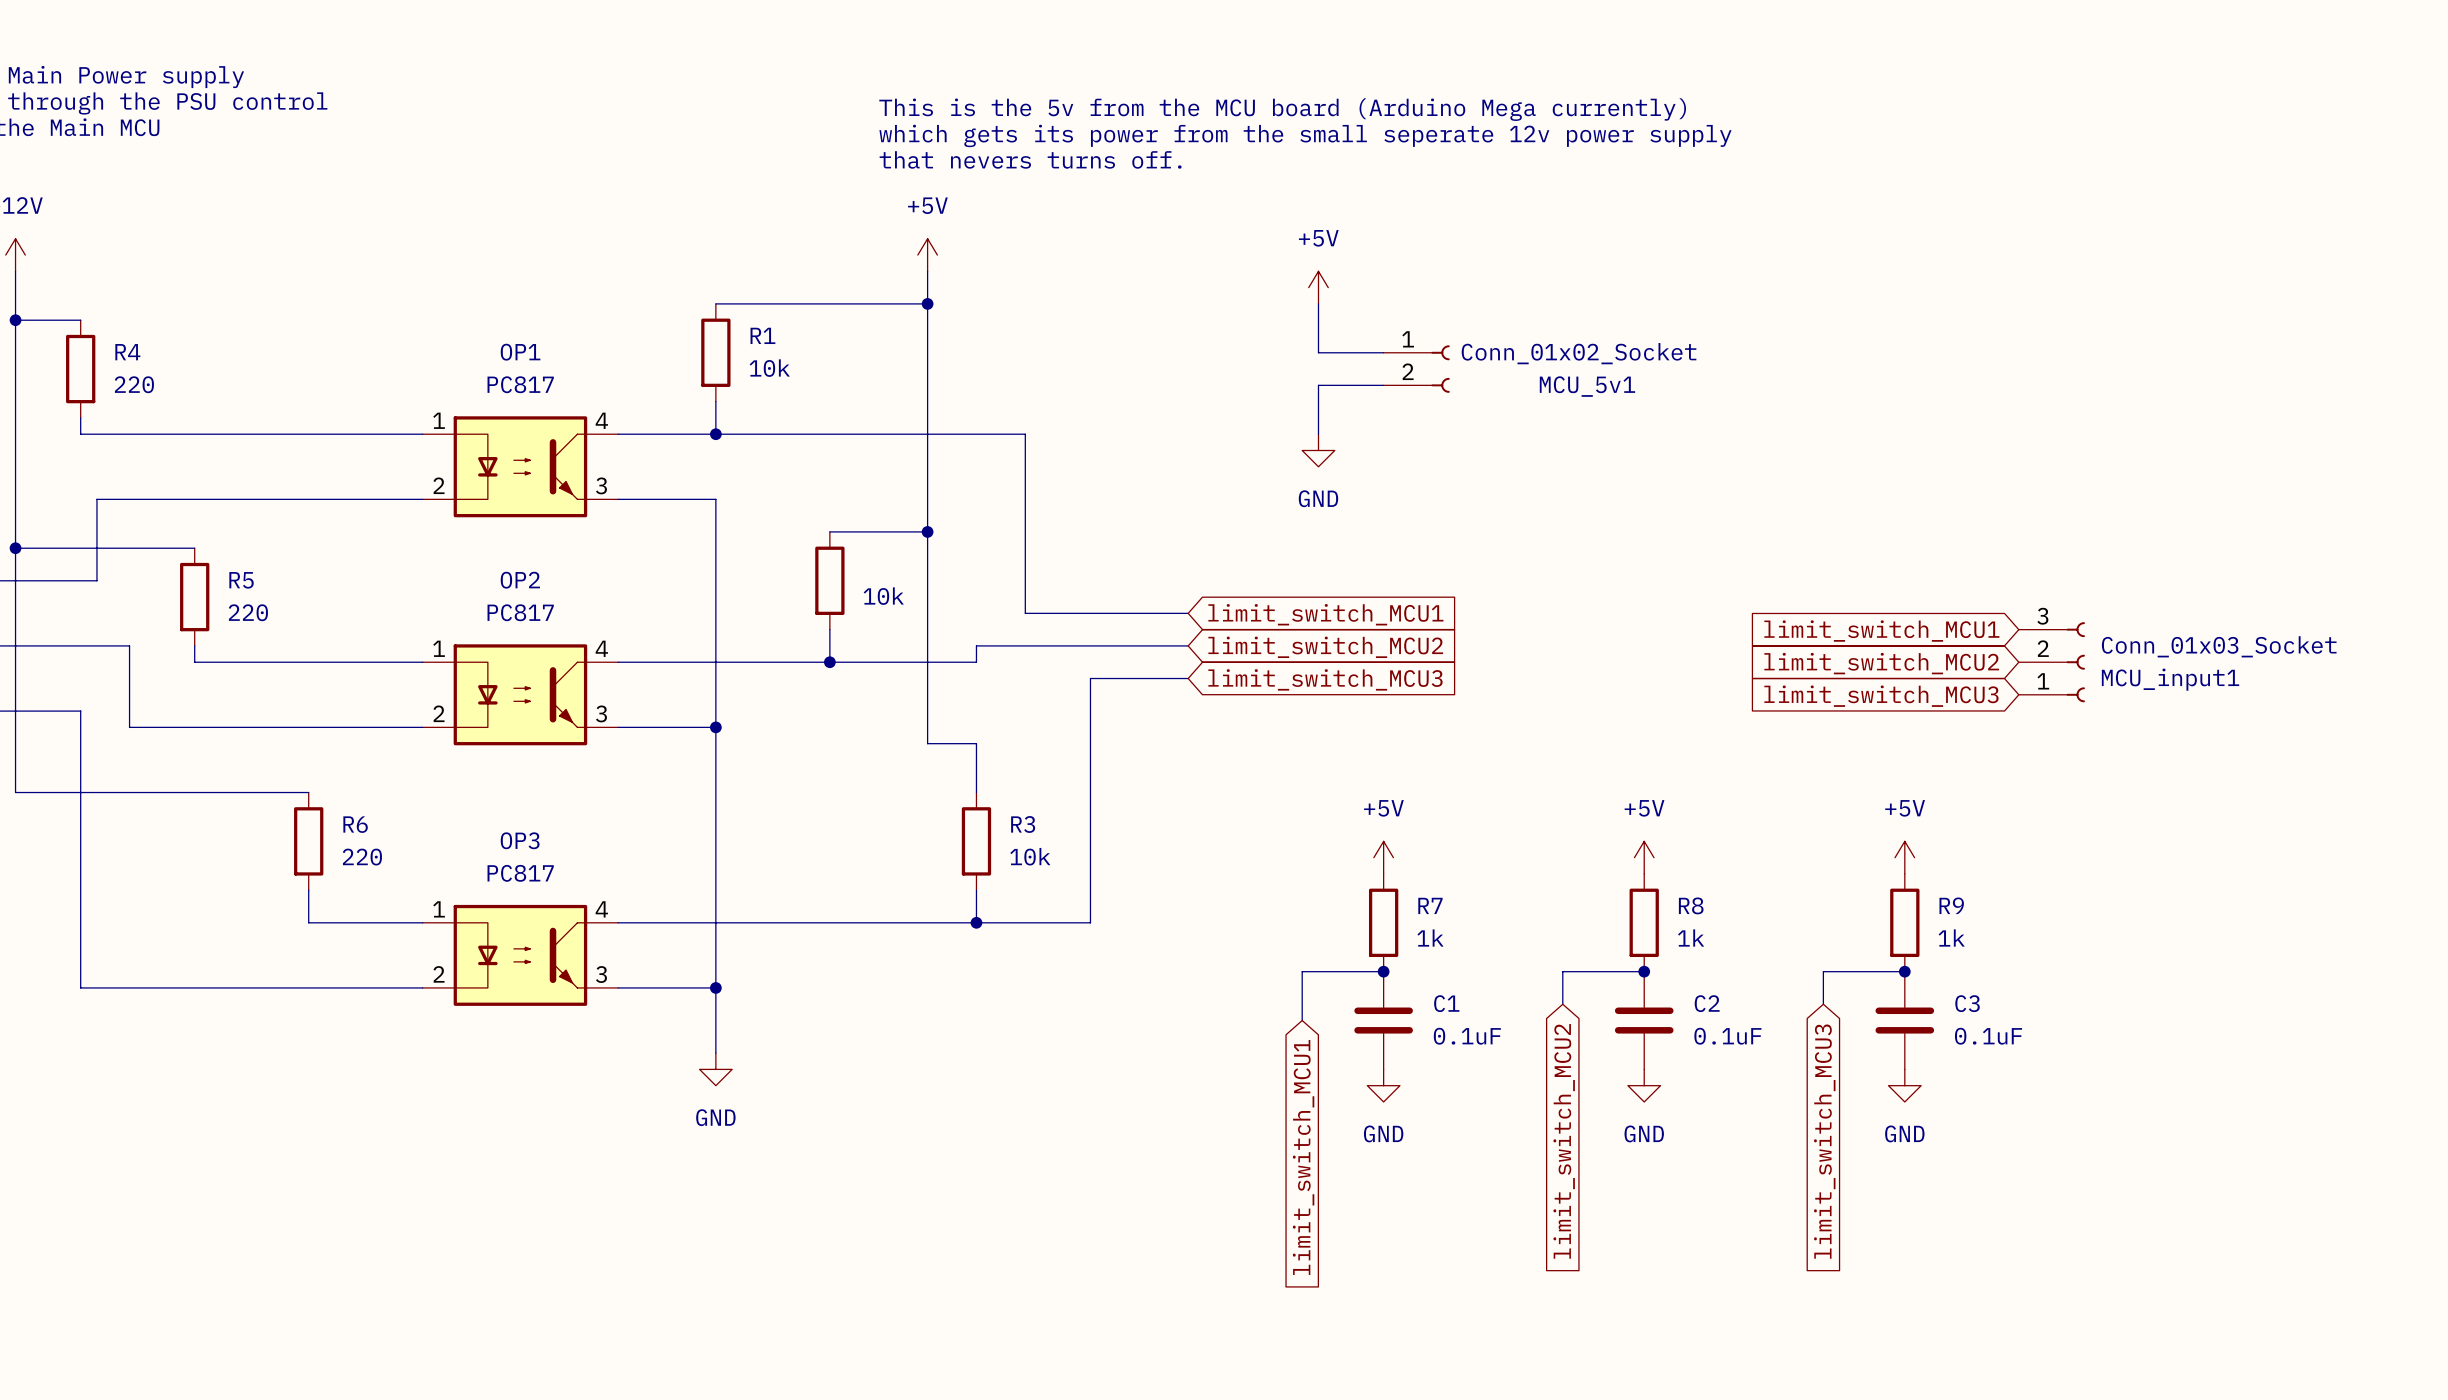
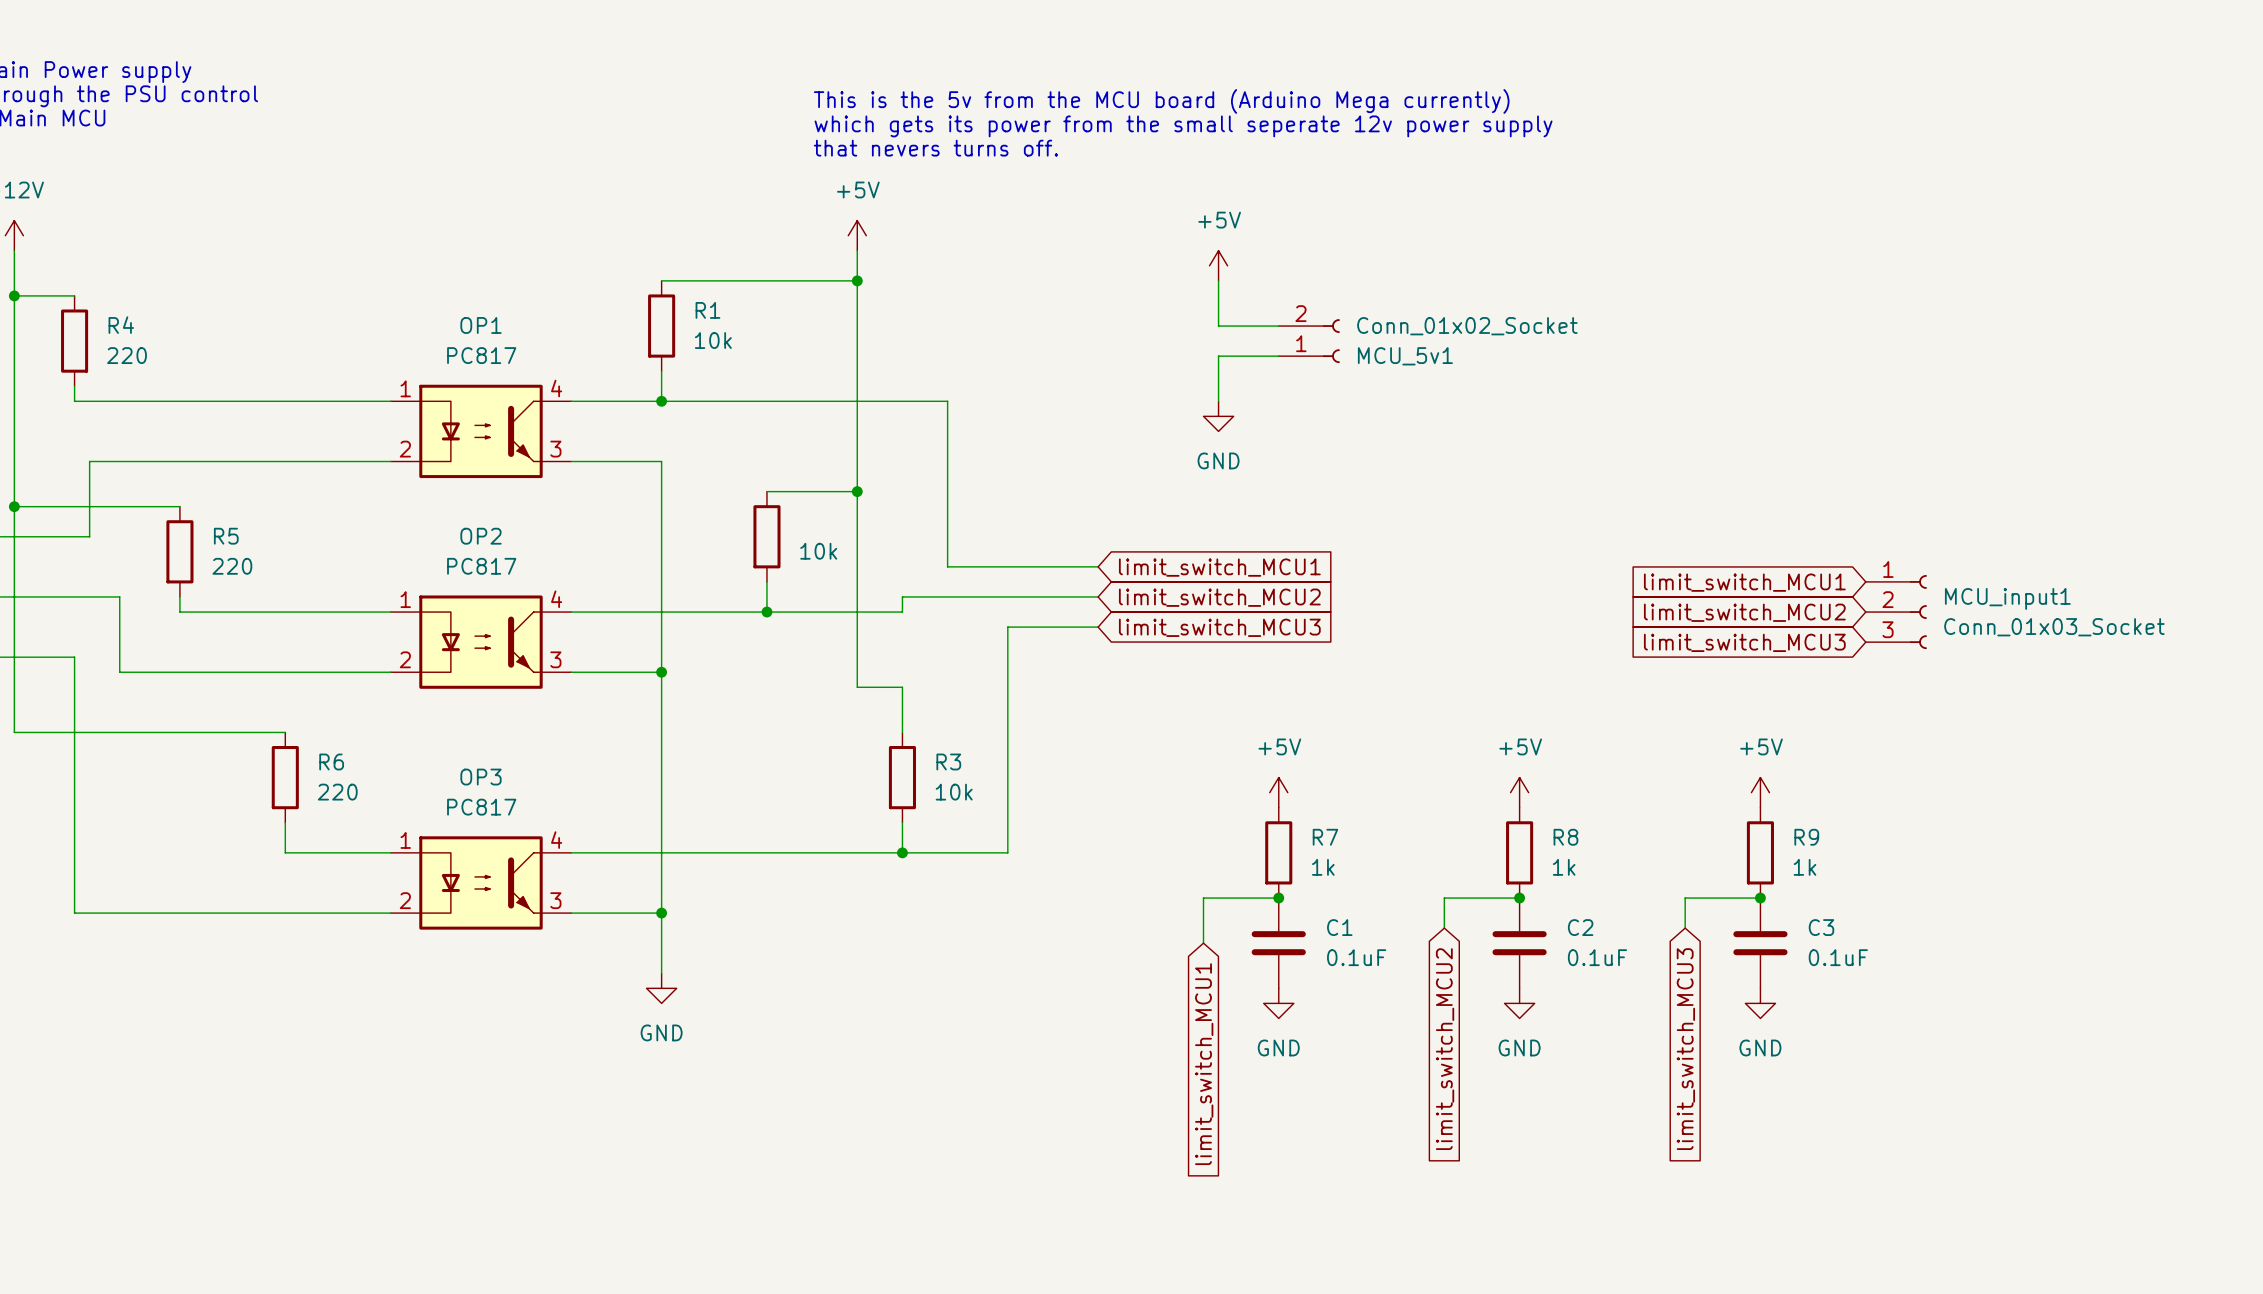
MCU_5v1 flip: as is (1440, 369) -> up-down (1331, 341)
MCU_5v1 name position: MCU_5v1 (1587, 386) -> MCU_5v1 (1405, 356)
MCU_input1 flip: as is (2075, 662) -> up-down (1918, 612)

